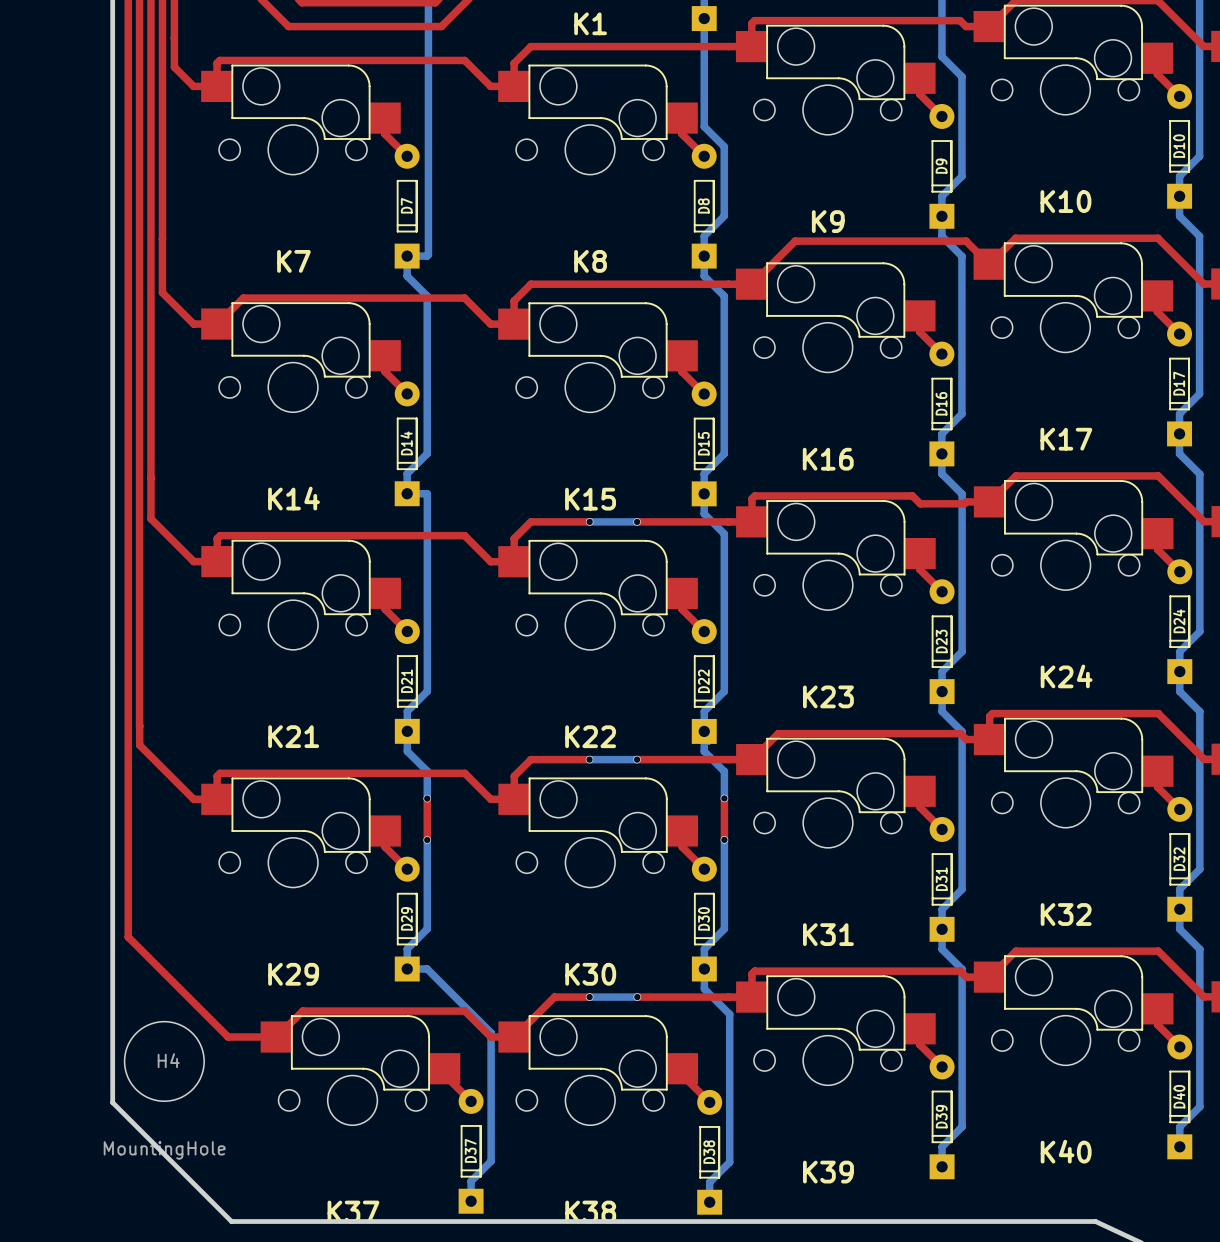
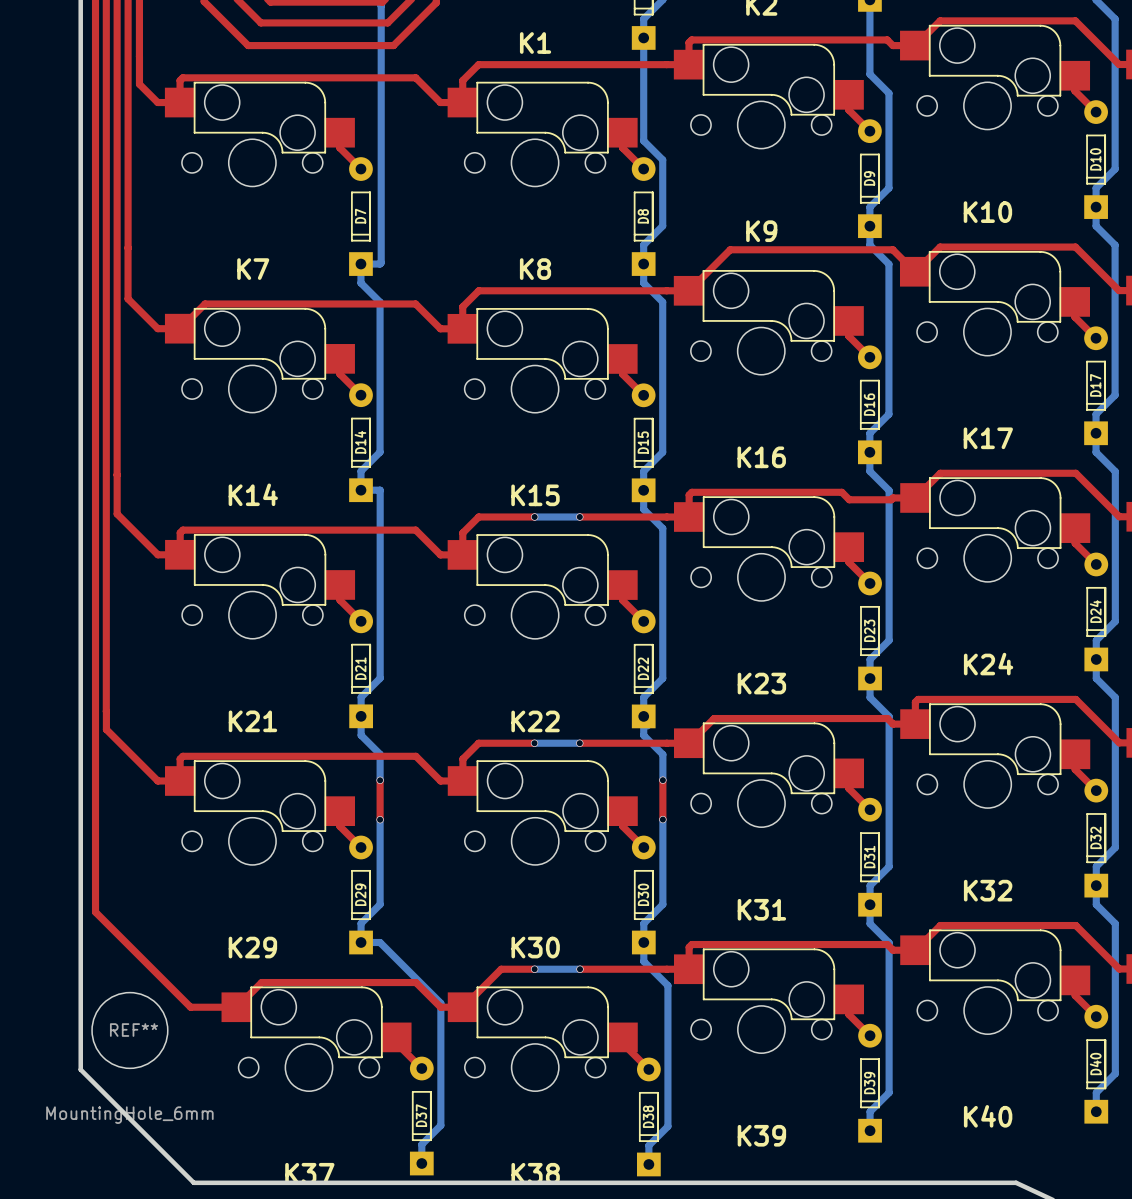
H4 name: H4 (168, 1060) -> REF** (134, 1030)
H4 value: MountingHole (164, 1150) -> MountingHole_6mm (129, 1115)

